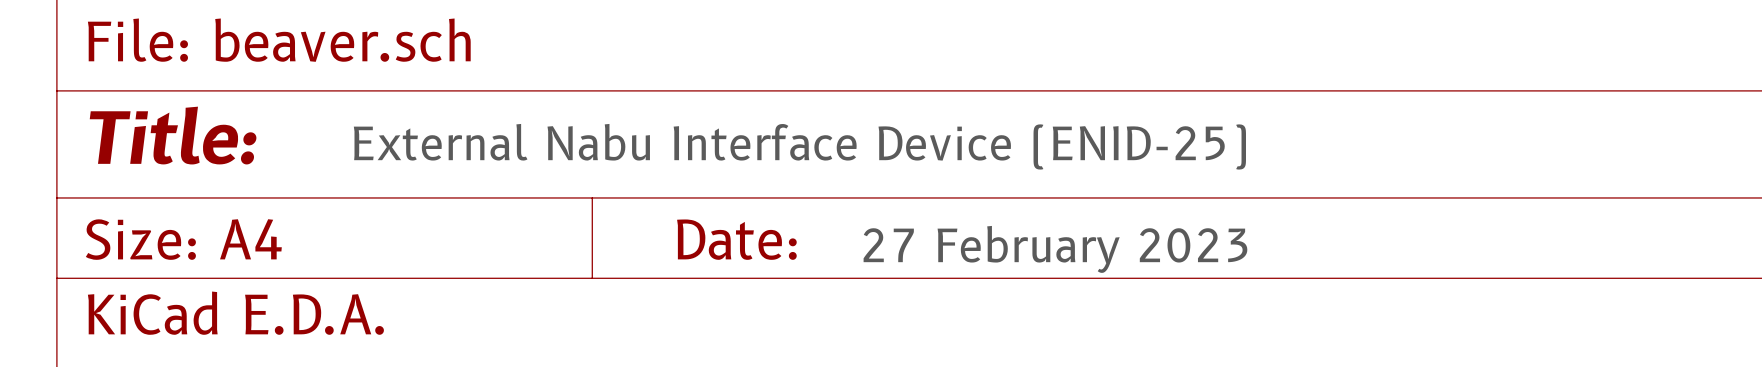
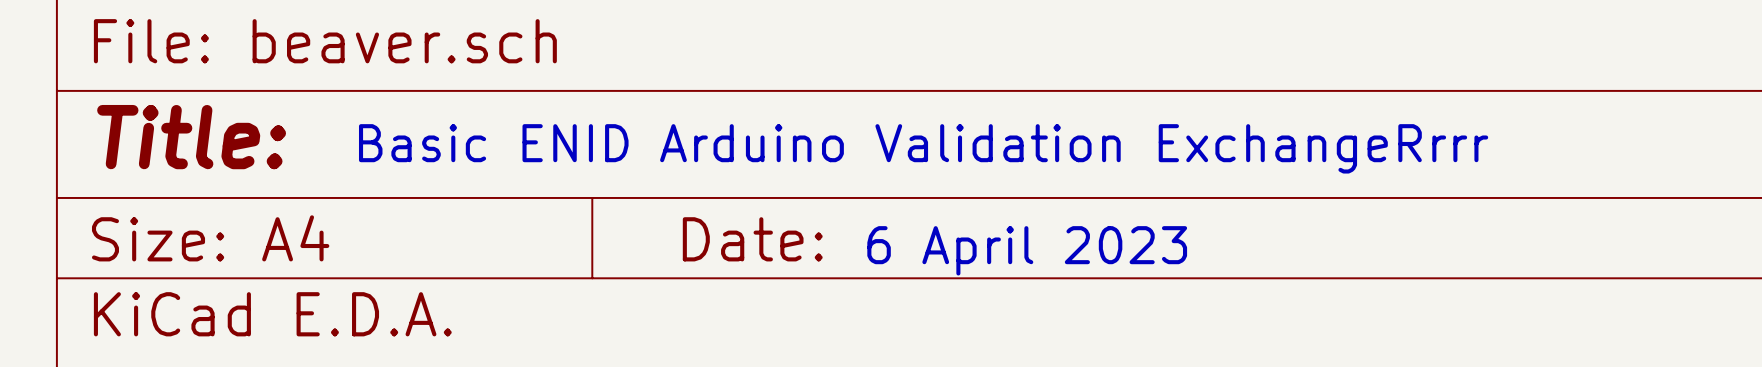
text: External Nabu Interface Device (ENID-25) (799, 146) -> Basic ENID Arduino Validation ExchangeRrrr (923, 148)
text: 27 February 2023 (1055, 249) -> 6 April 2023 (1027, 250)

